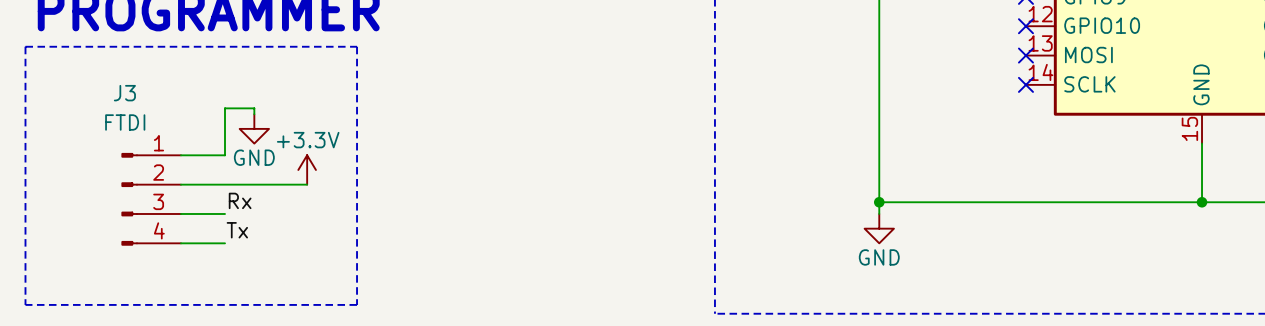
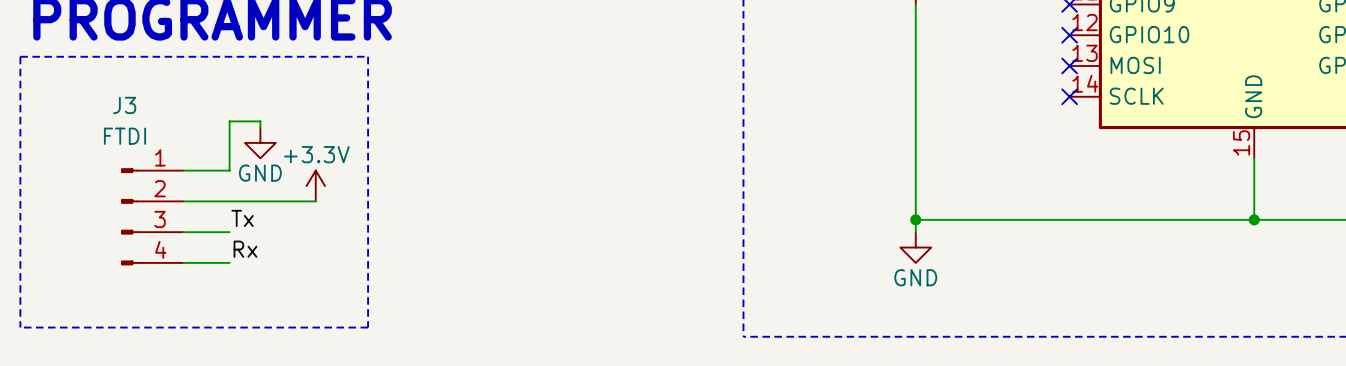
label: Rx (240, 200) -> Tx (242, 218)
label: Tx (237, 230) -> Rx (245, 249)

